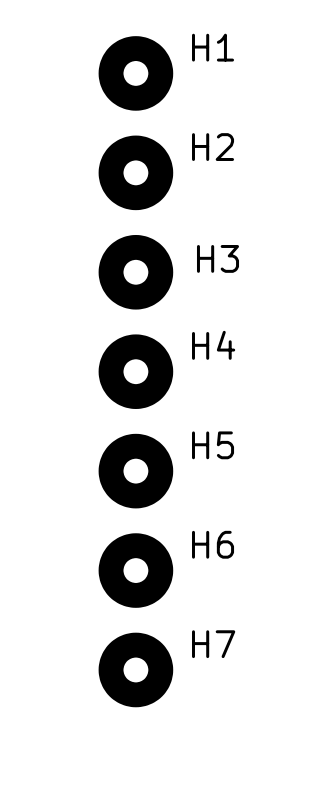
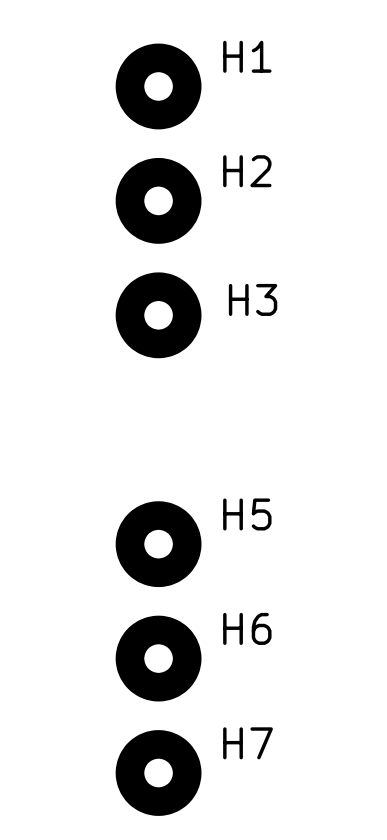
H4: (135, 371) -> none

